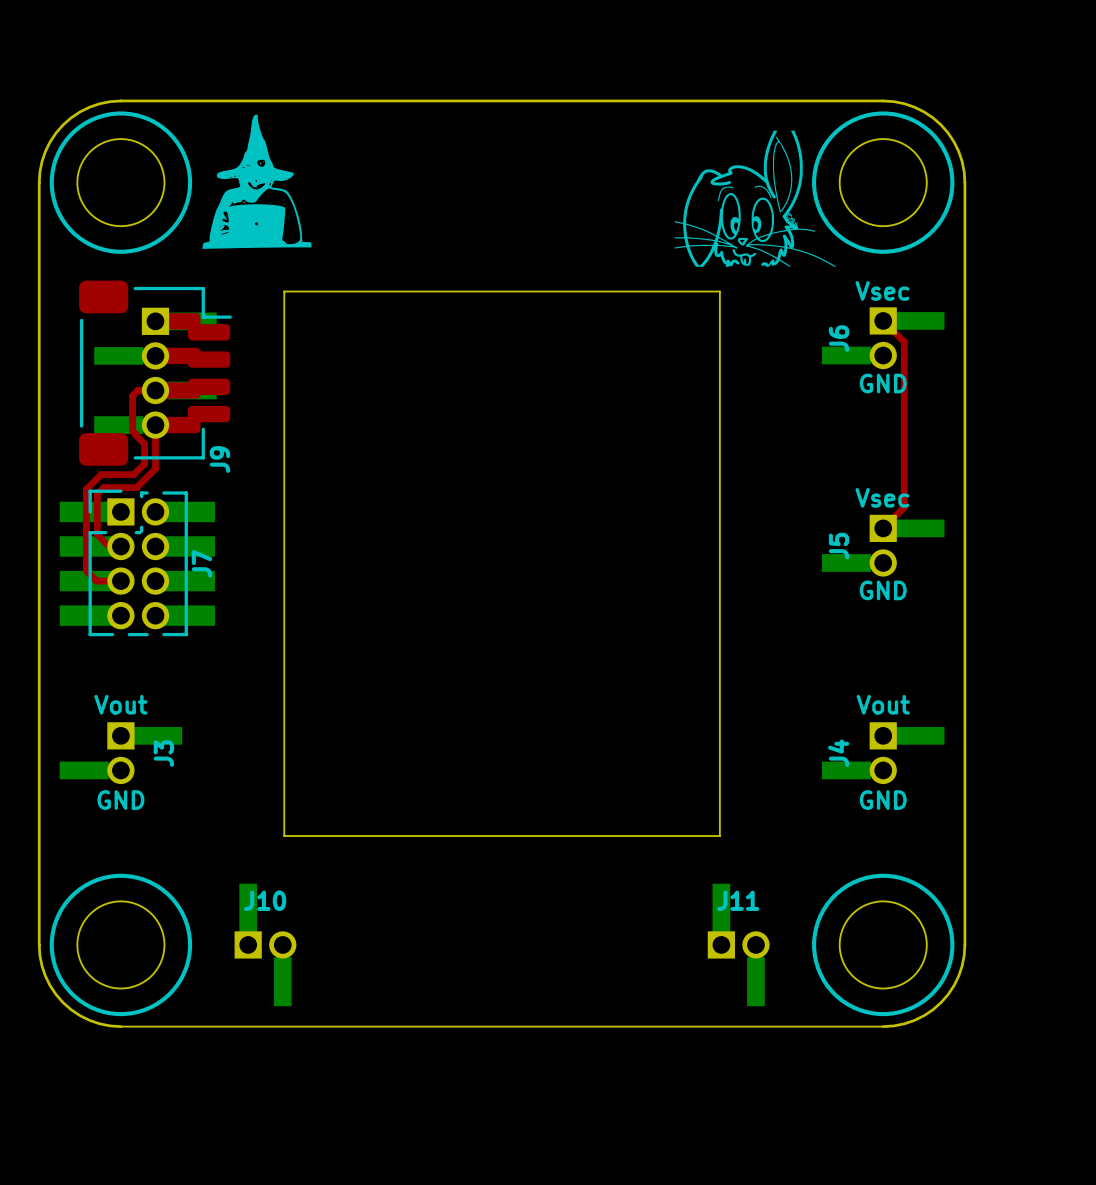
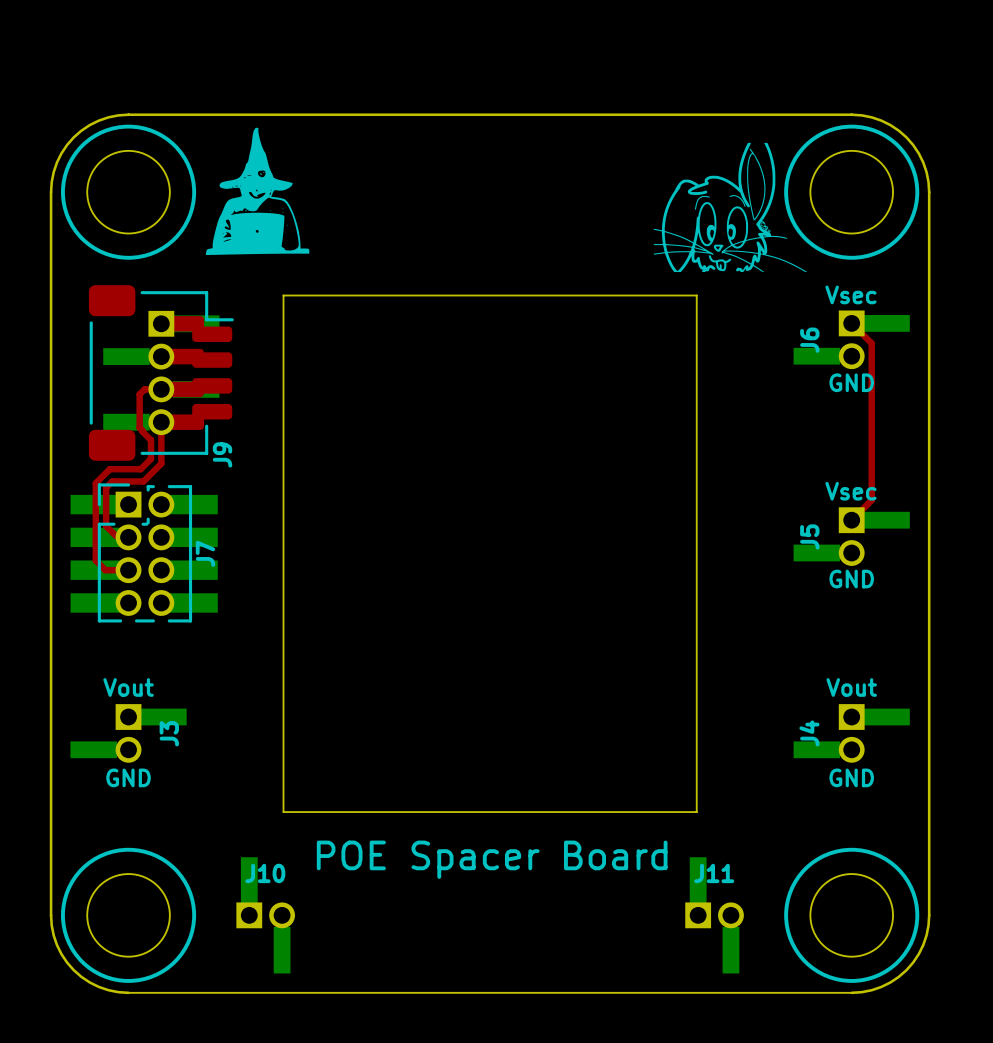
text: none -> POE Spacer Board (492, 859)

